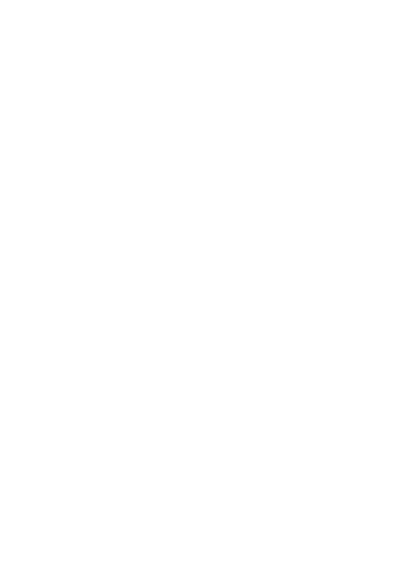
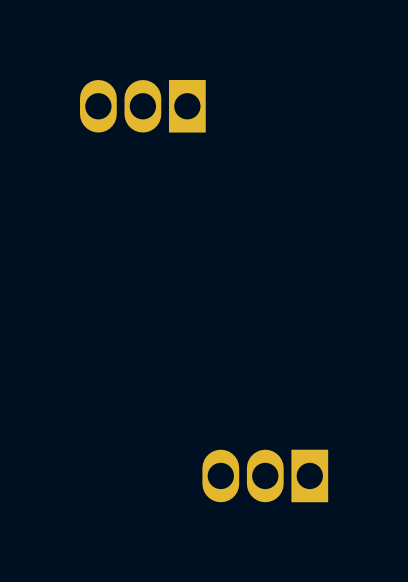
part: none -> (142, 106)
part: none -> (265, 475)

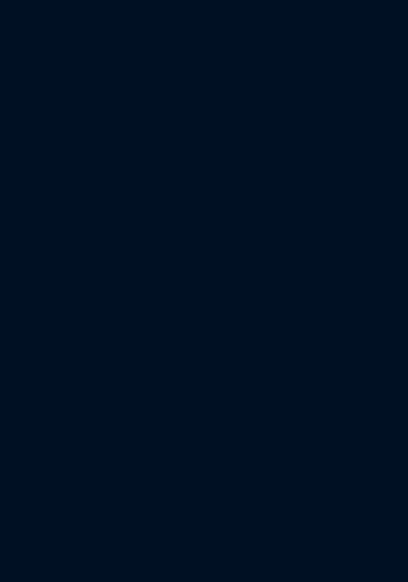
part: (142, 106) -> none
part: (265, 475) -> none

